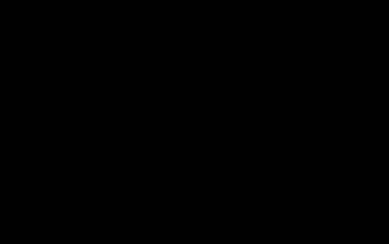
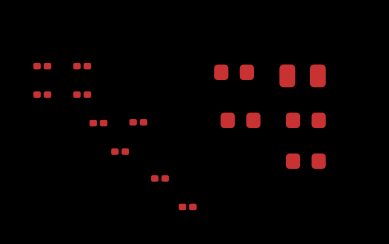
part: none -> (42, 66)
part: none -> (82, 66)
part: none -> (234, 72)
part: none -> (302, 75)
part: none -> (42, 94)
part: none -> (82, 94)
part: none -> (240, 120)
part: none -> (305, 120)
part: none -> (138, 122)
part: none -> (98, 123)
part: none -> (120, 151)
part: none -> (305, 161)
part: none -> (159, 178)
part: none -> (187, 206)

